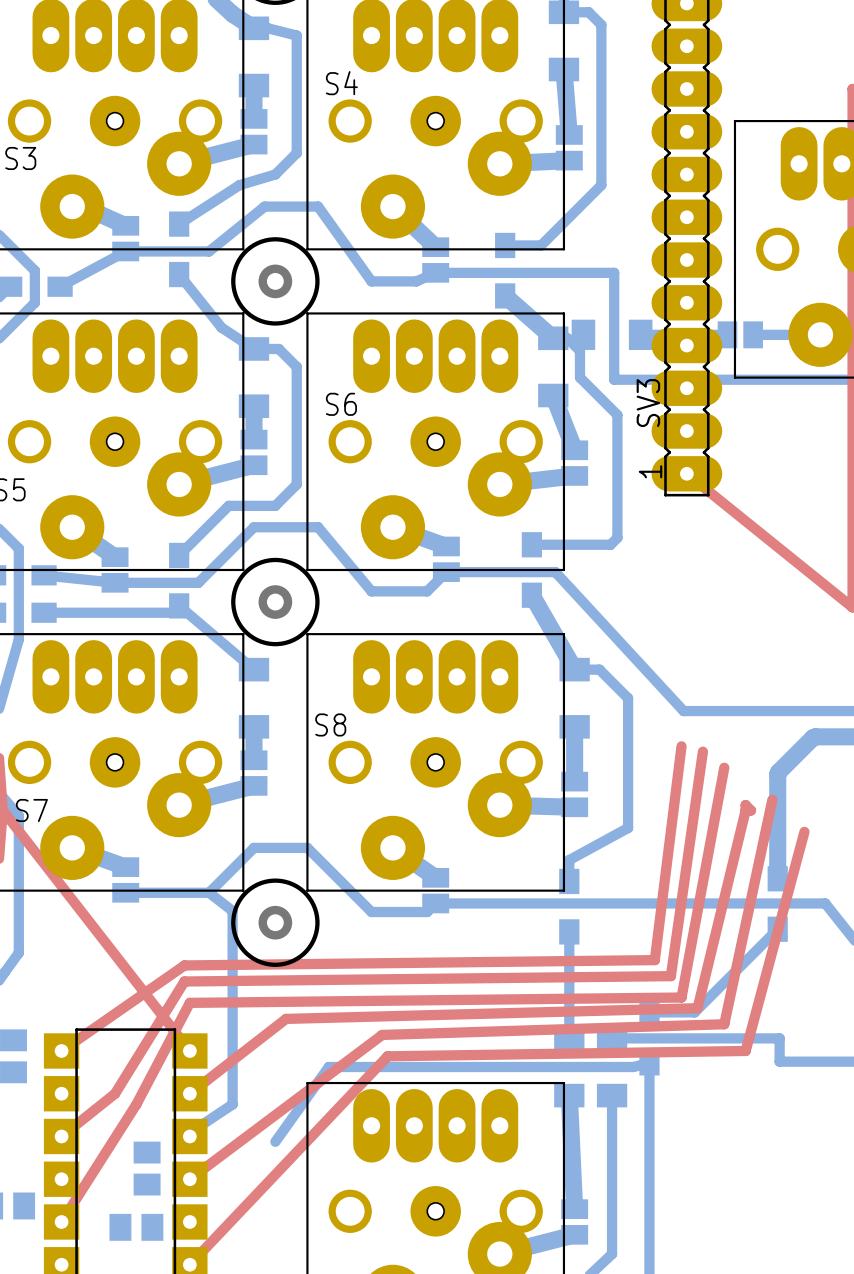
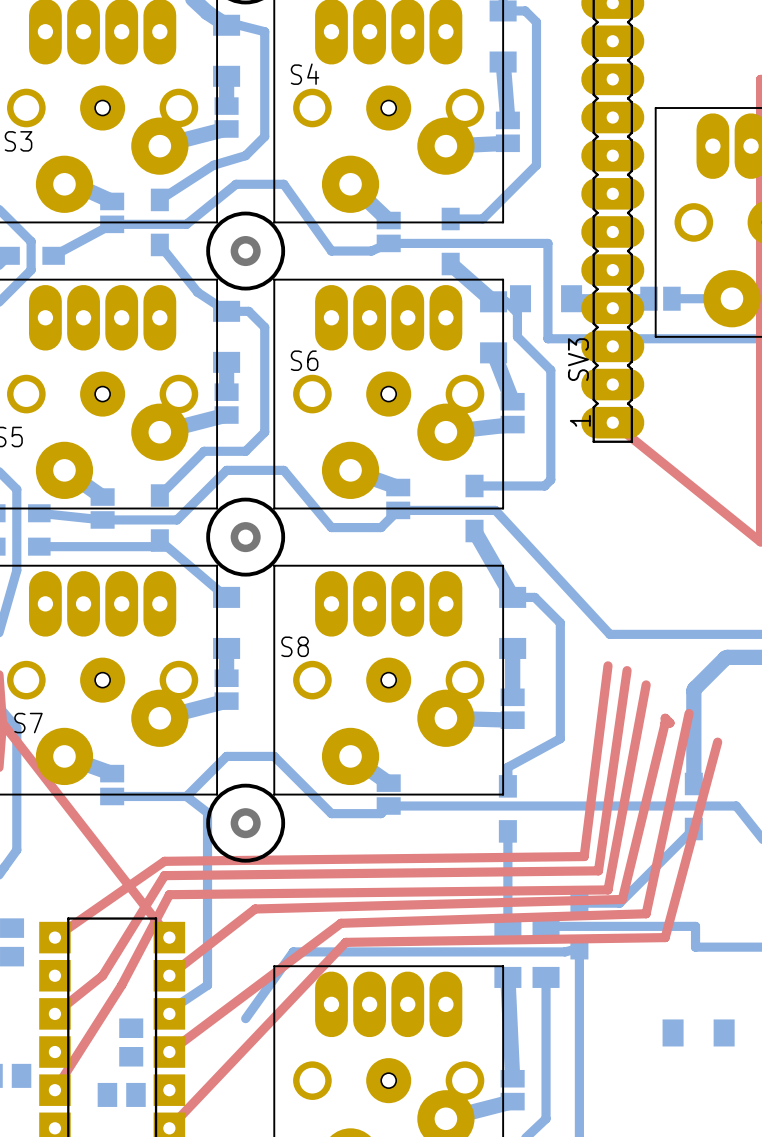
part: none -> (698, 1032)

